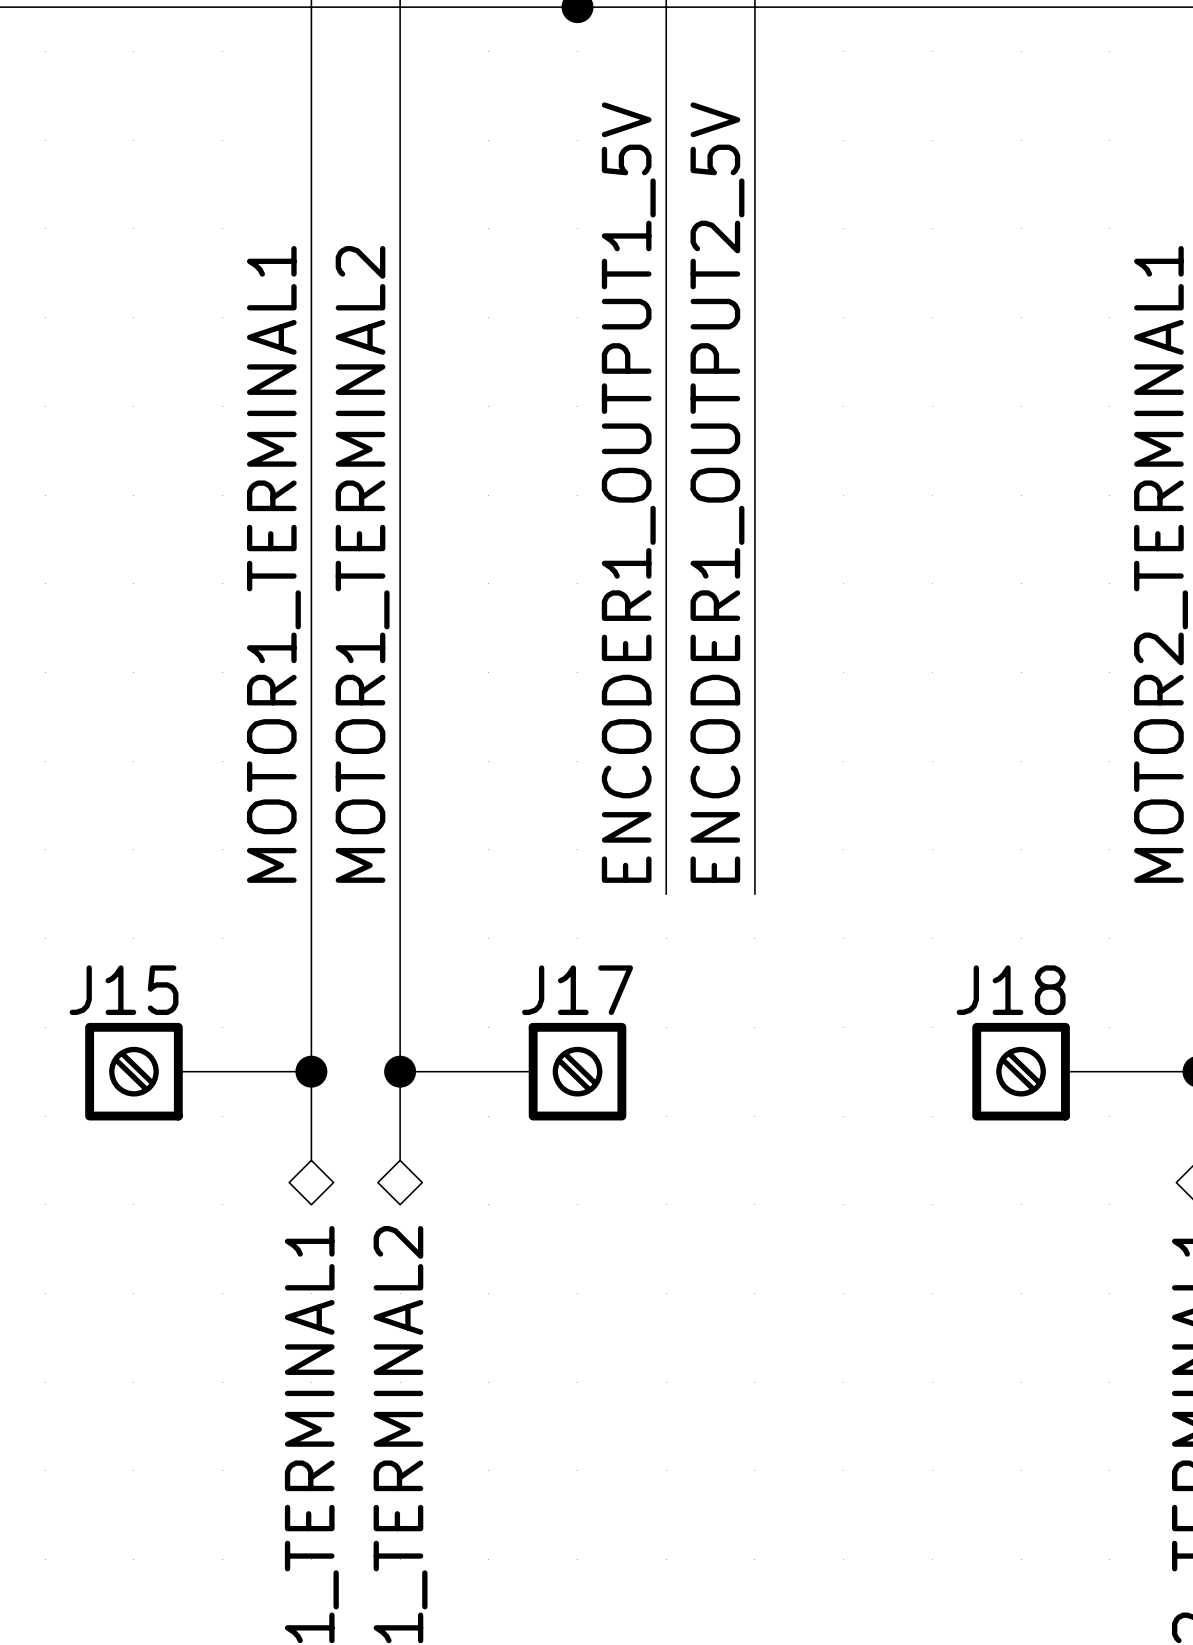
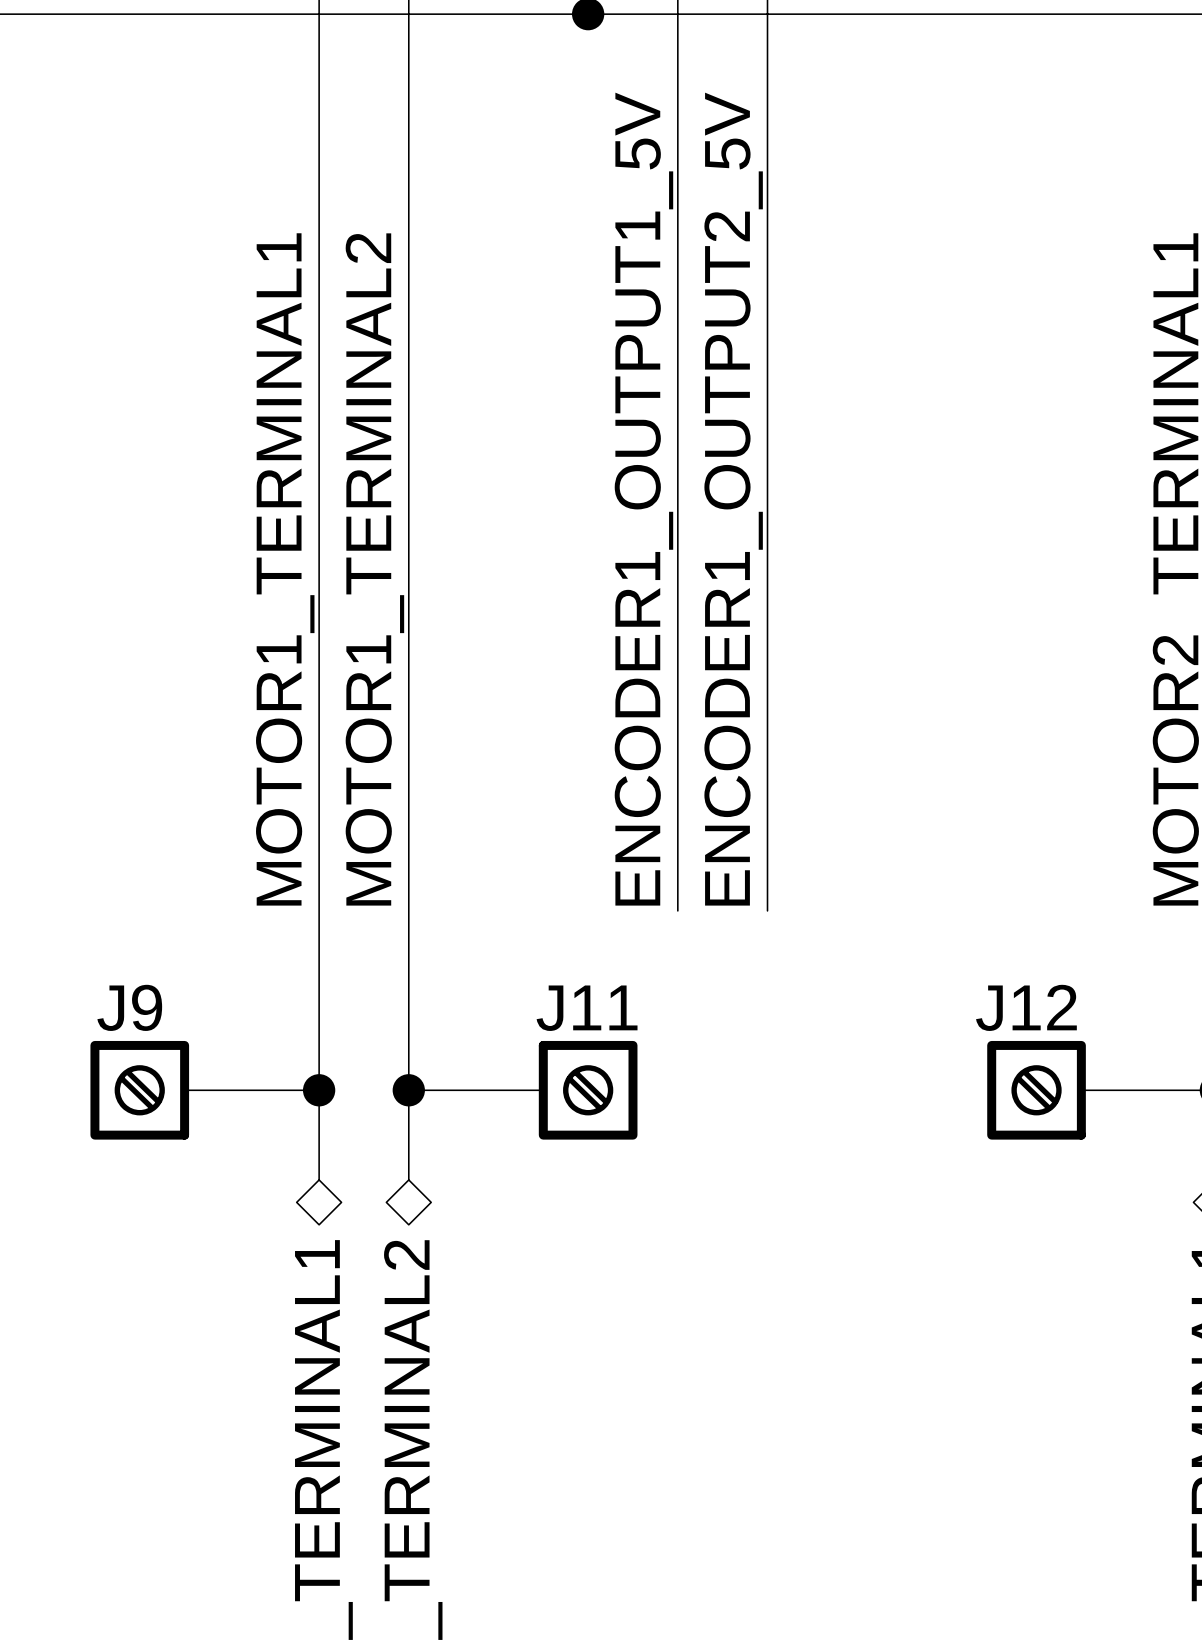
J15 name: J15 (124, 990) -> J9 (129, 1007)
J17 name: J17 (577, 990) -> J11 (587, 1008)
J18 name: J18 (1011, 990) -> J12 (1026, 1007)

